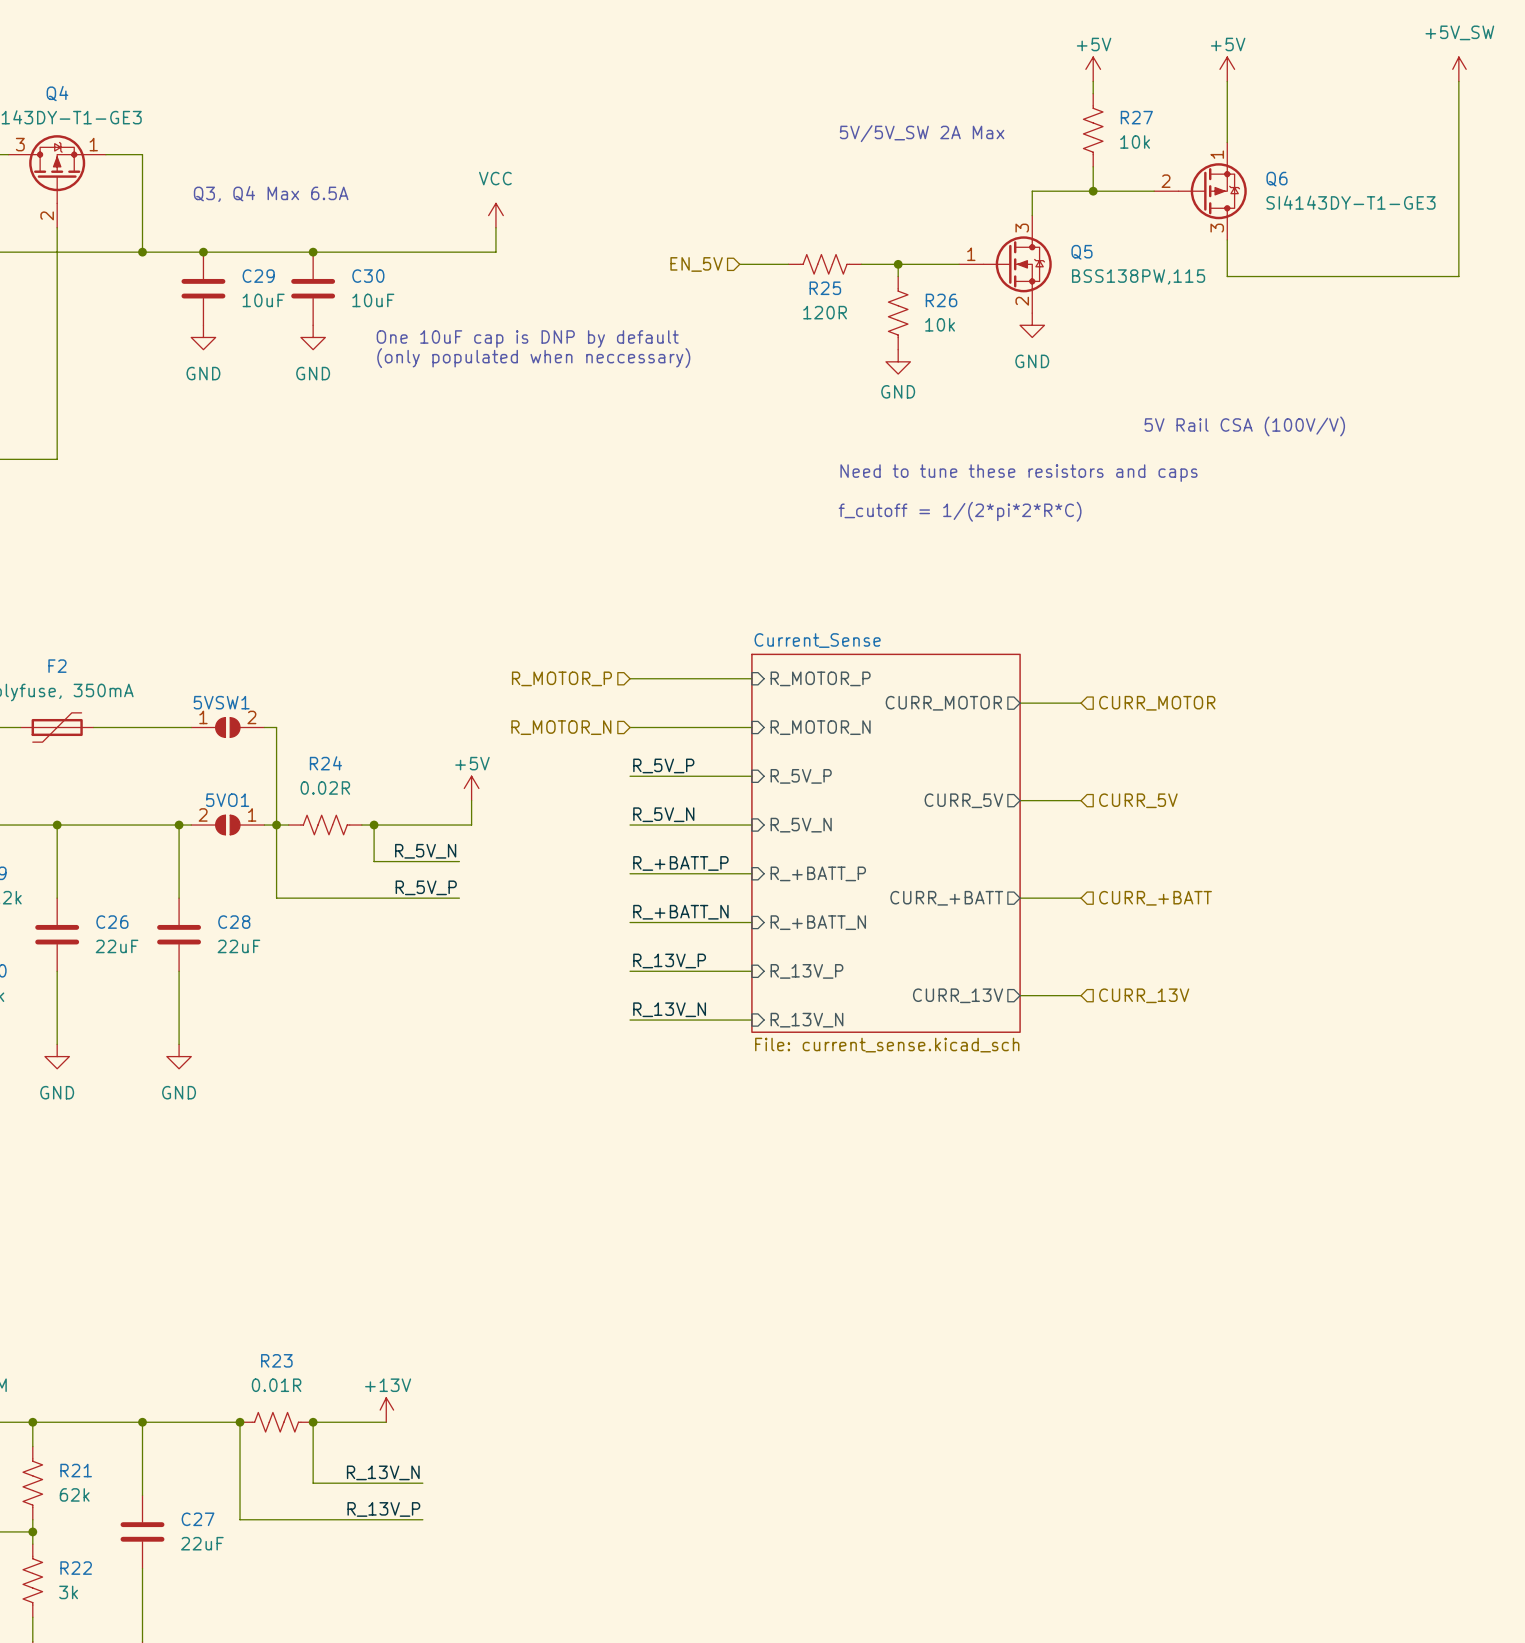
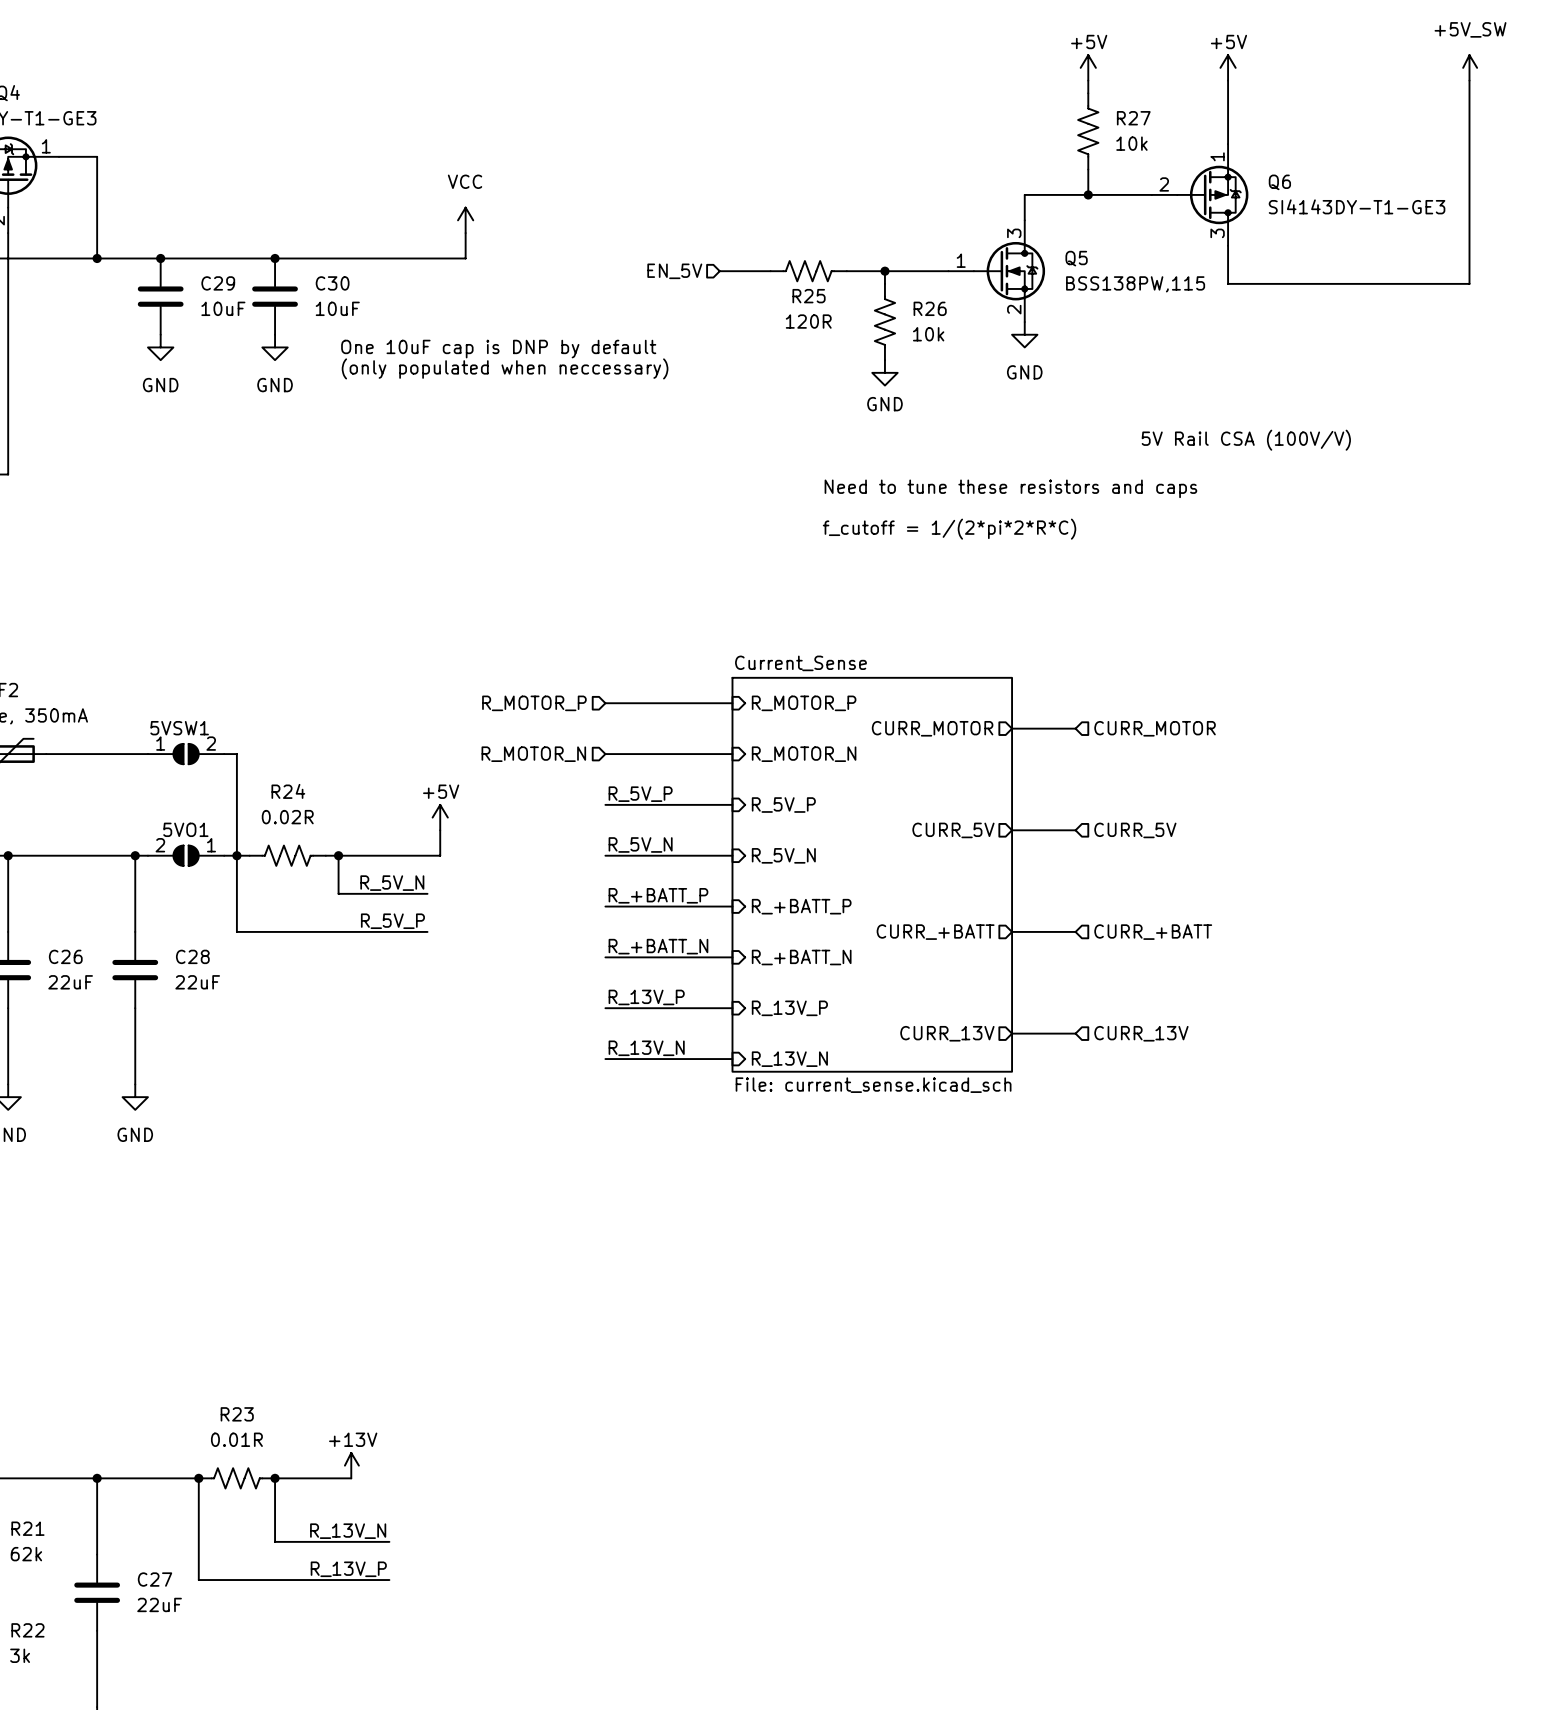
text: 5V/5V_SW 2A Max (922, 133) -> none
text: Q3, Q4 Max 6.5A (271, 193) -> none

